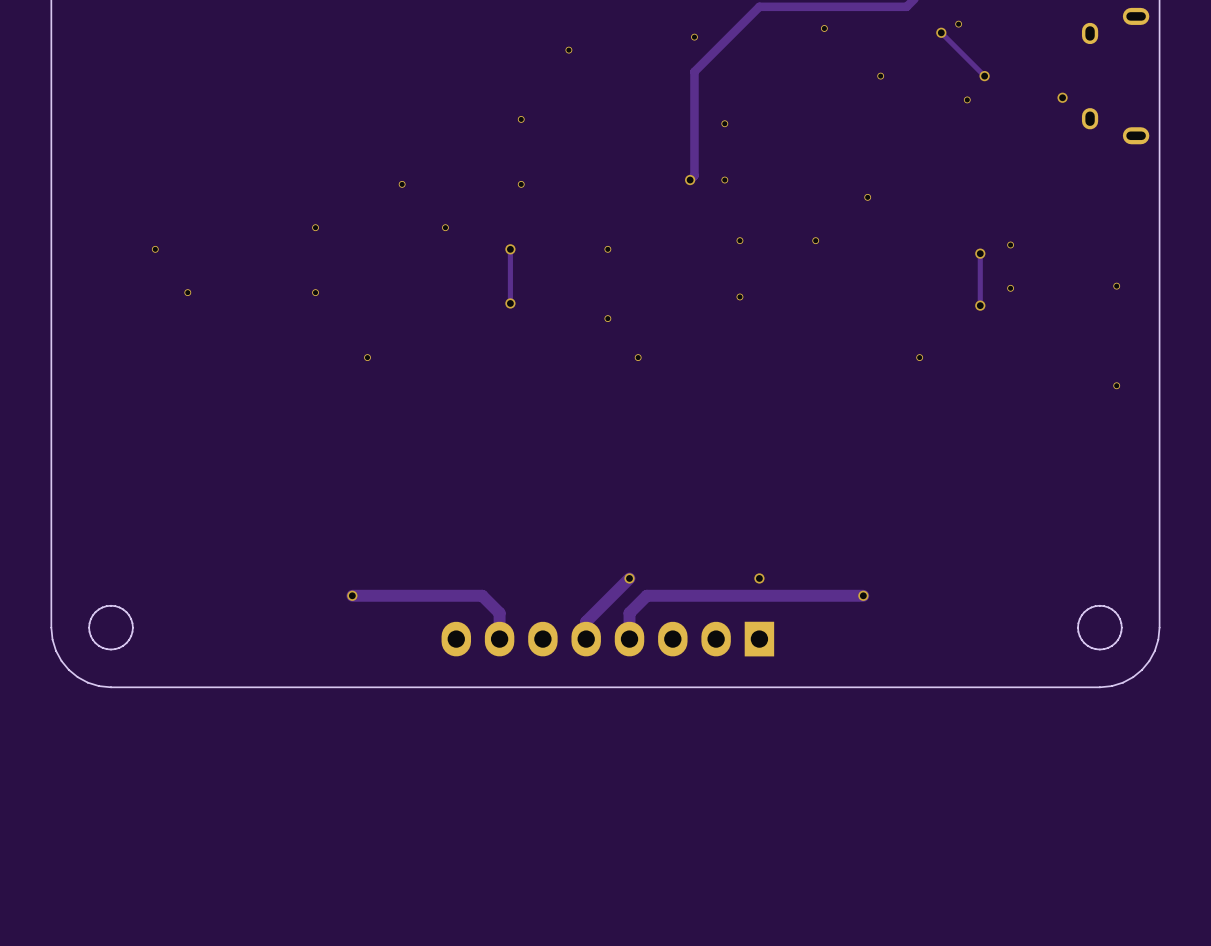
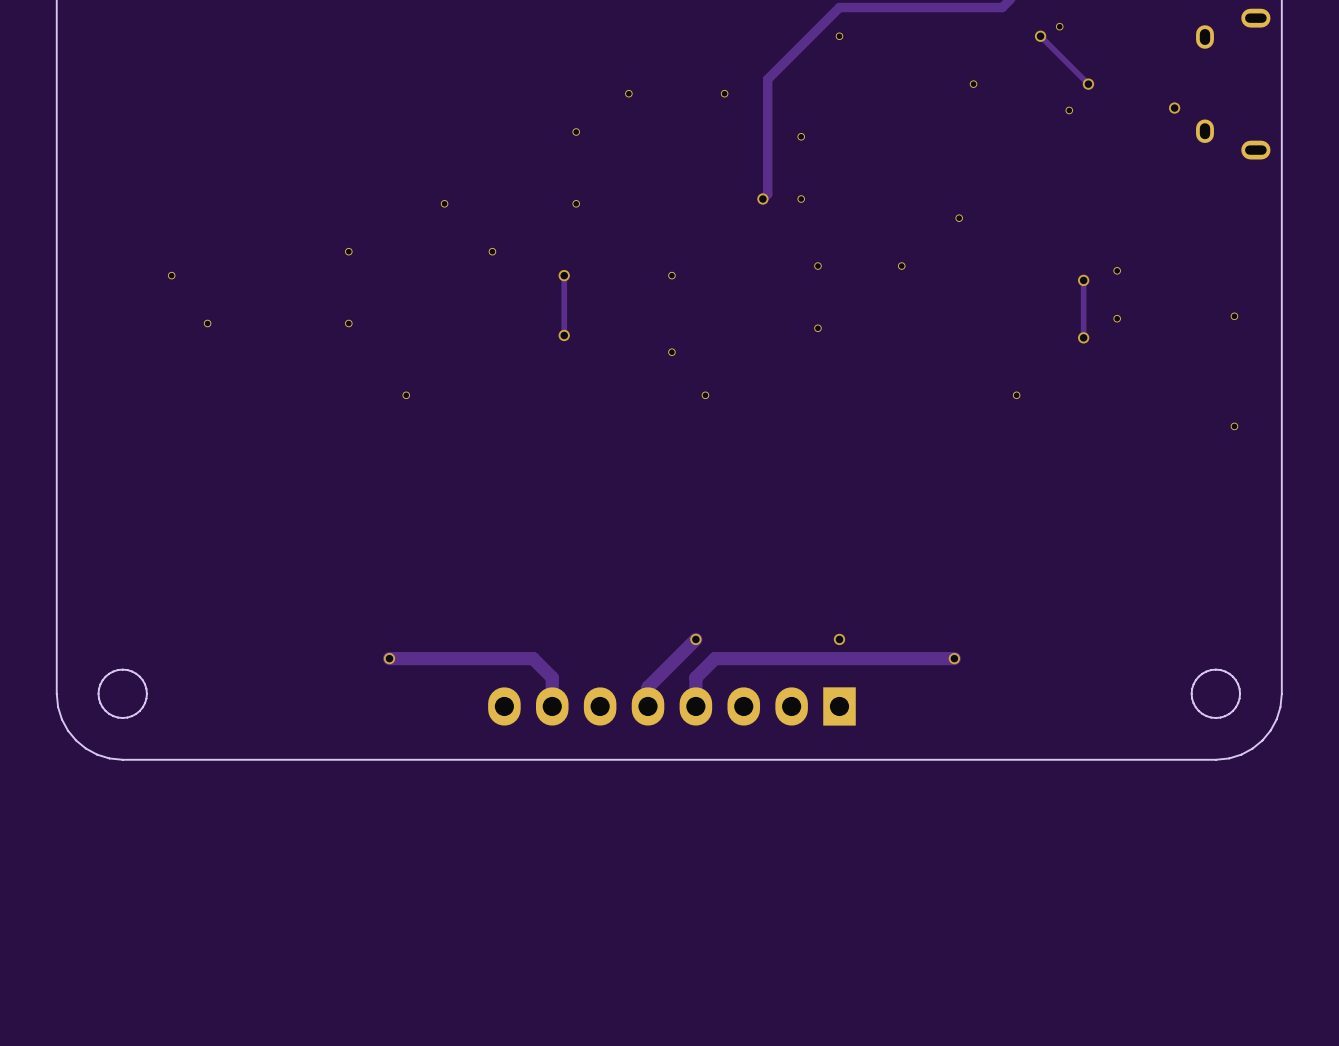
part: (824, 28) -> none
part: none -> (839, 36)
part: (694, 37) -> none
part position: (568, 50) -> (628, 93)
part: none -> (724, 93)

